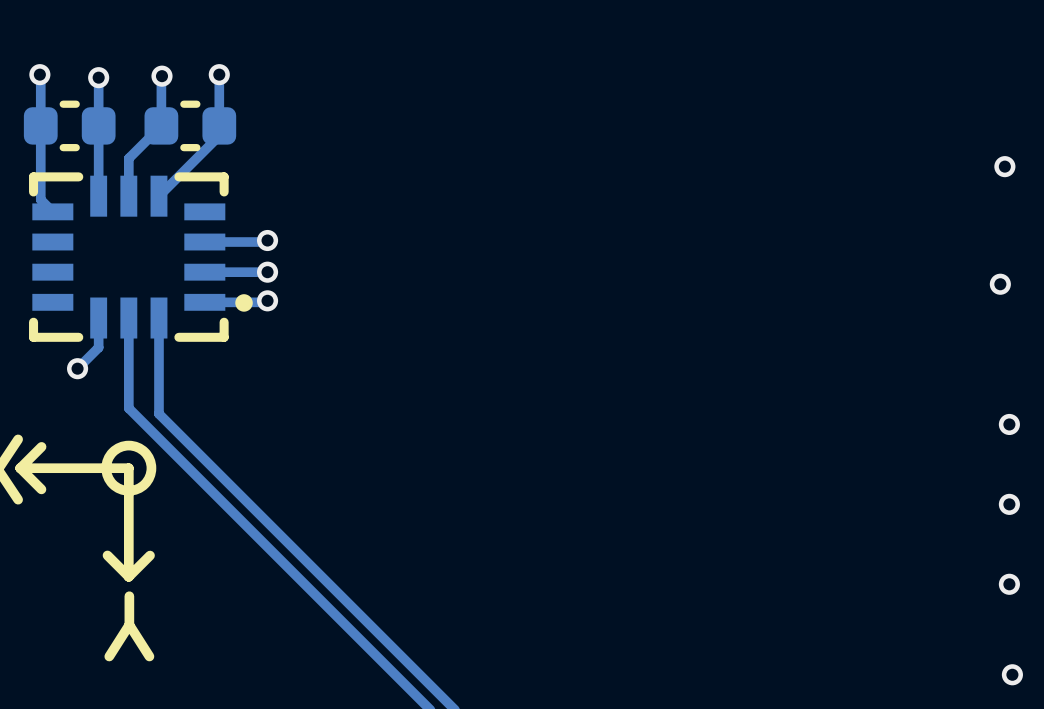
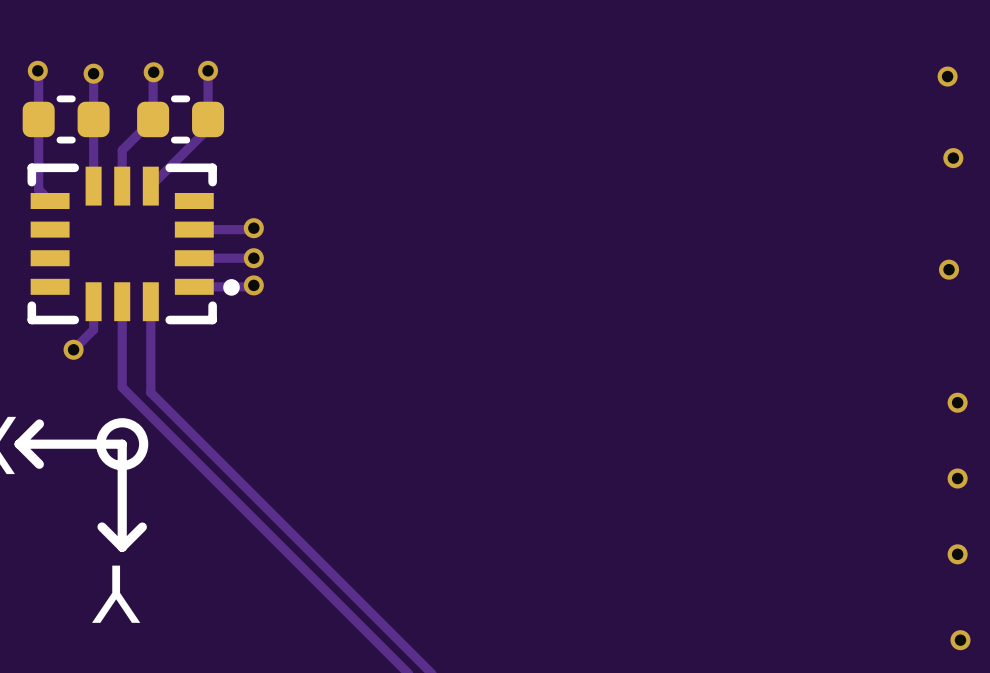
via: none -> (947, 76)

